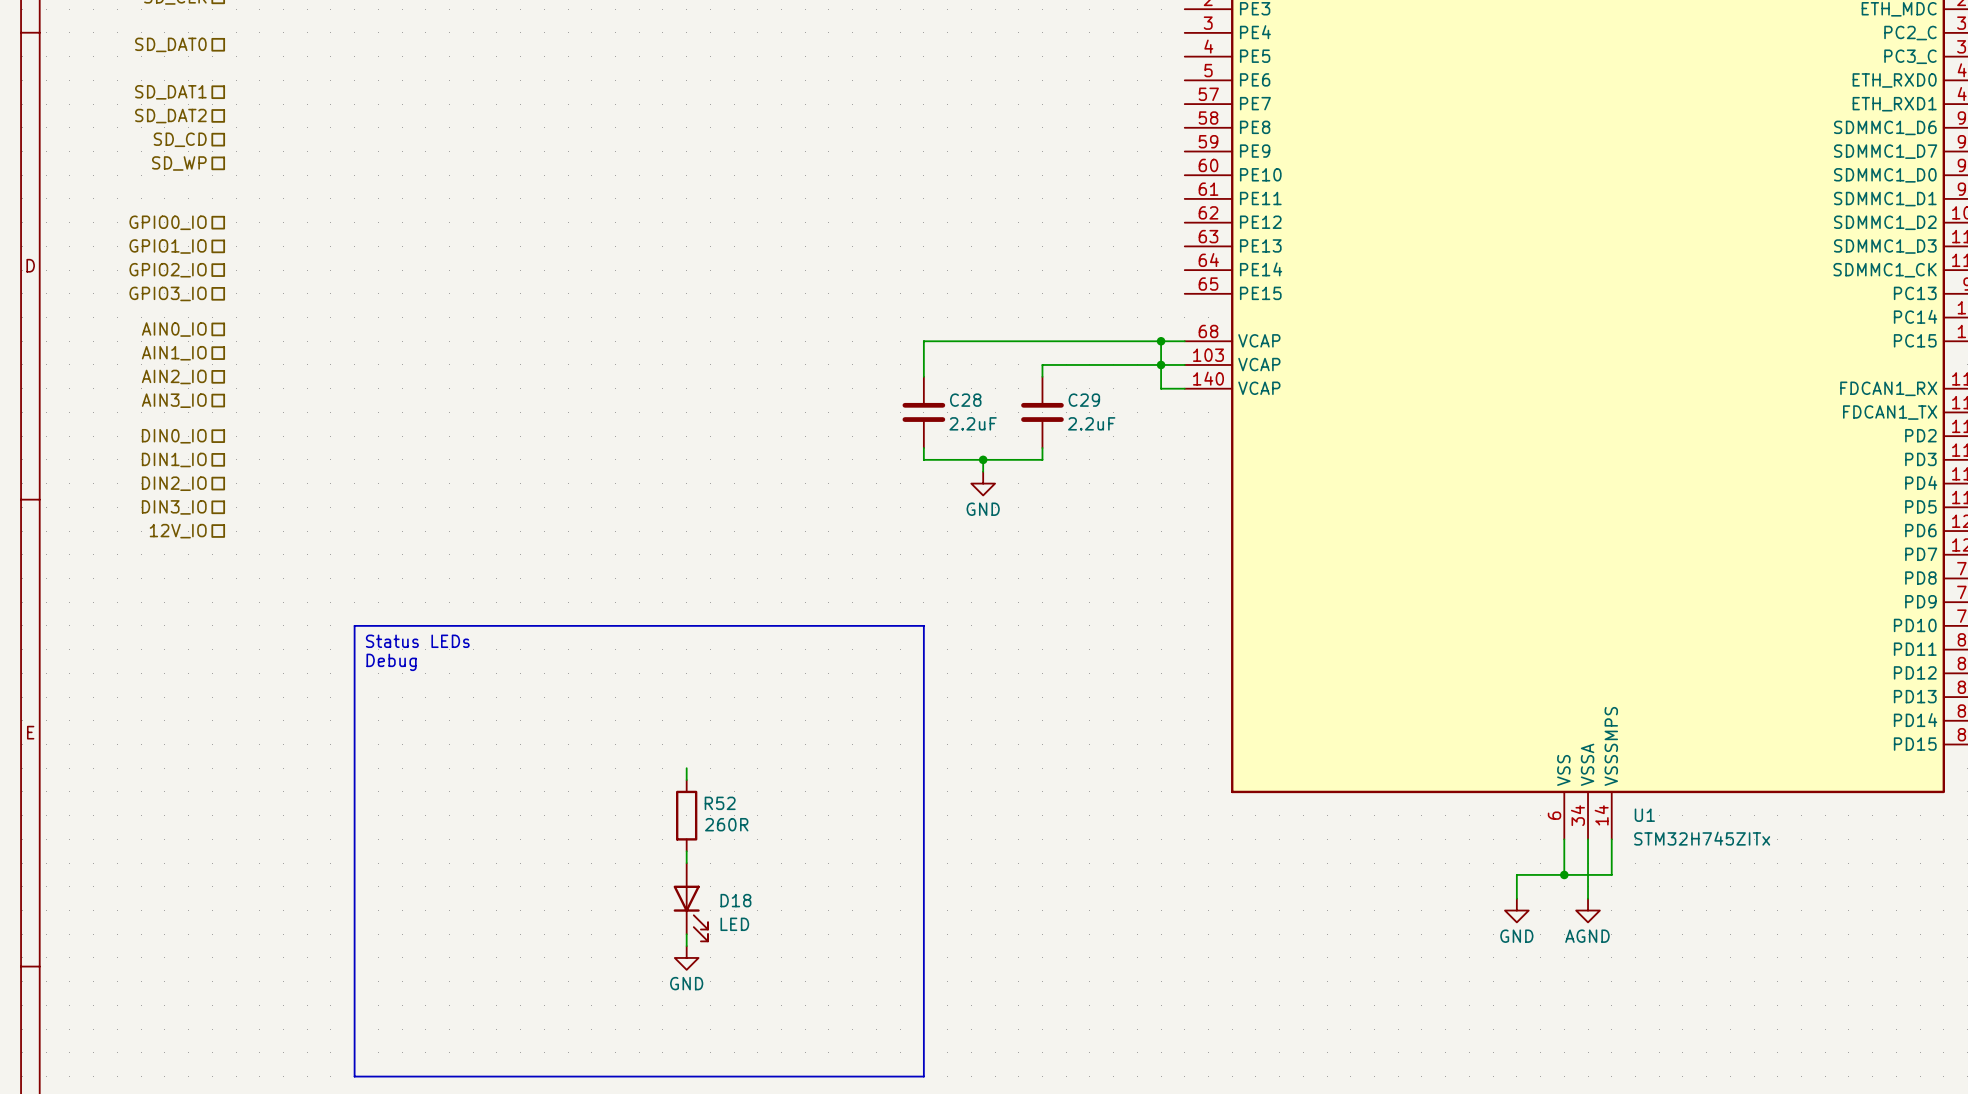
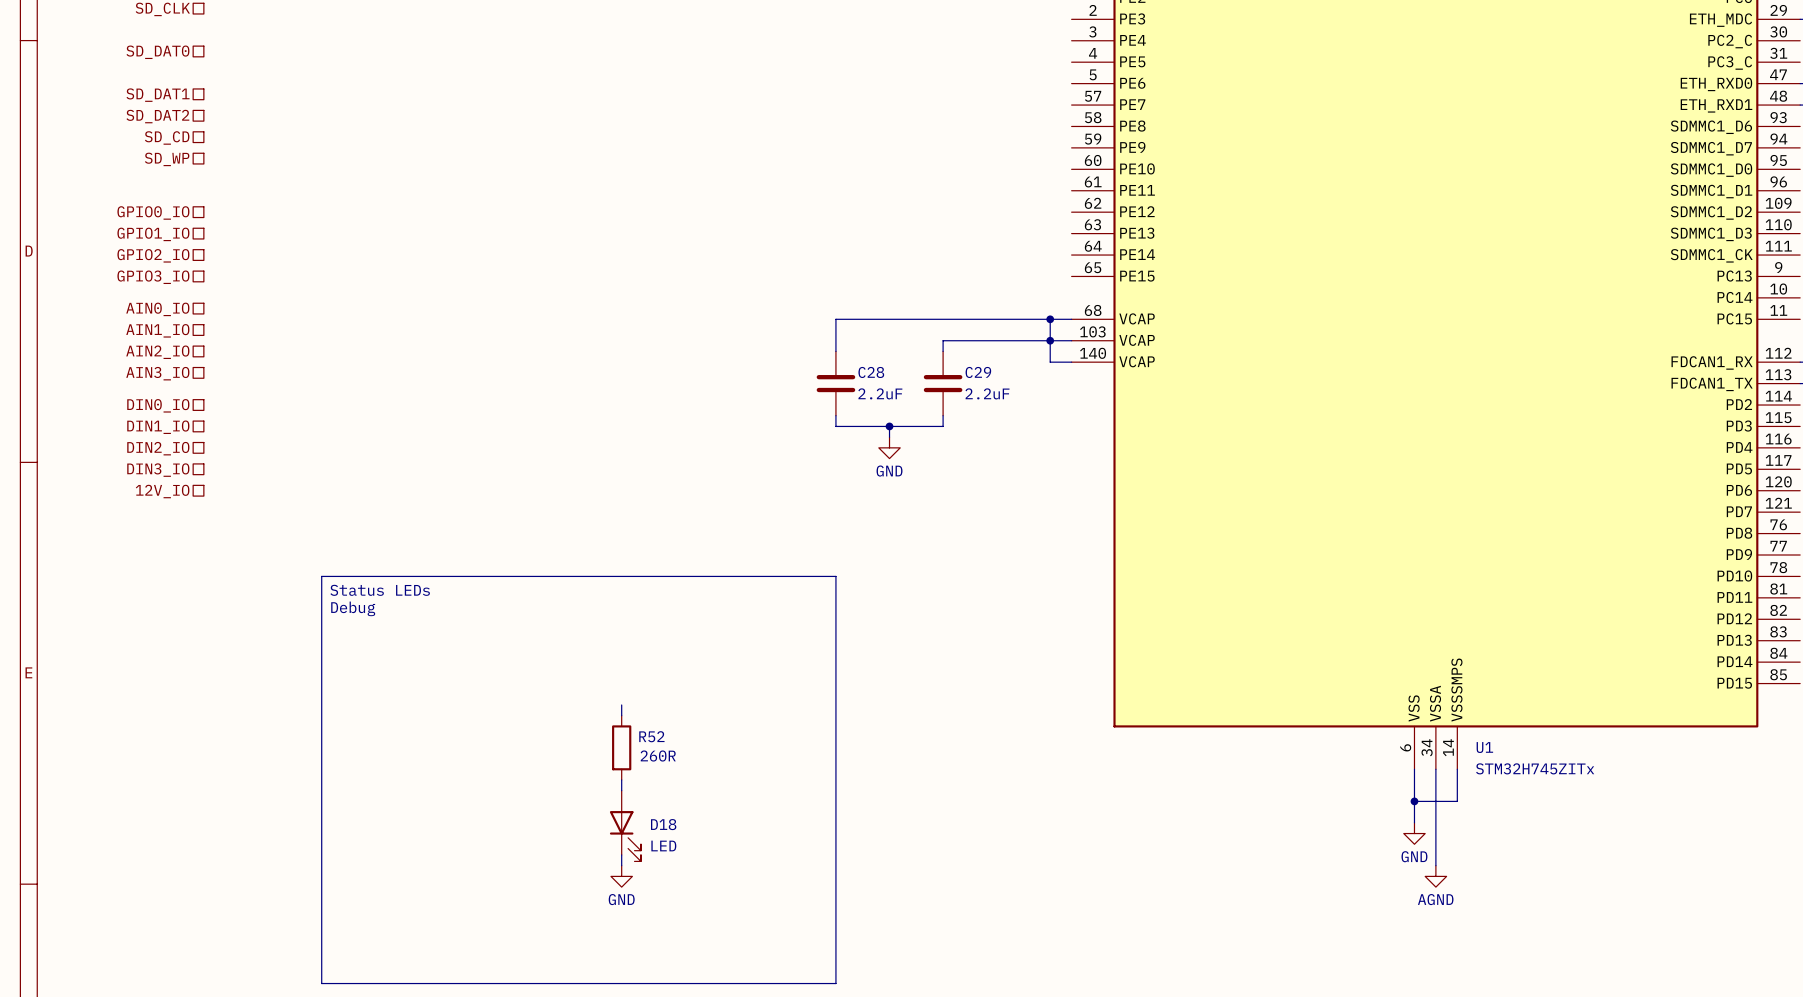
wire: (1564, 874) (1516, 874) (1516, 898) -> (1414, 801) (1414, 822)
wire: none -> (1435, 822) (1435, 865)
power symbol position: GND (1516, 910) -> GND (1414, 833)
power symbol position: AGND (1588, 910) -> AGND (1435, 876)

